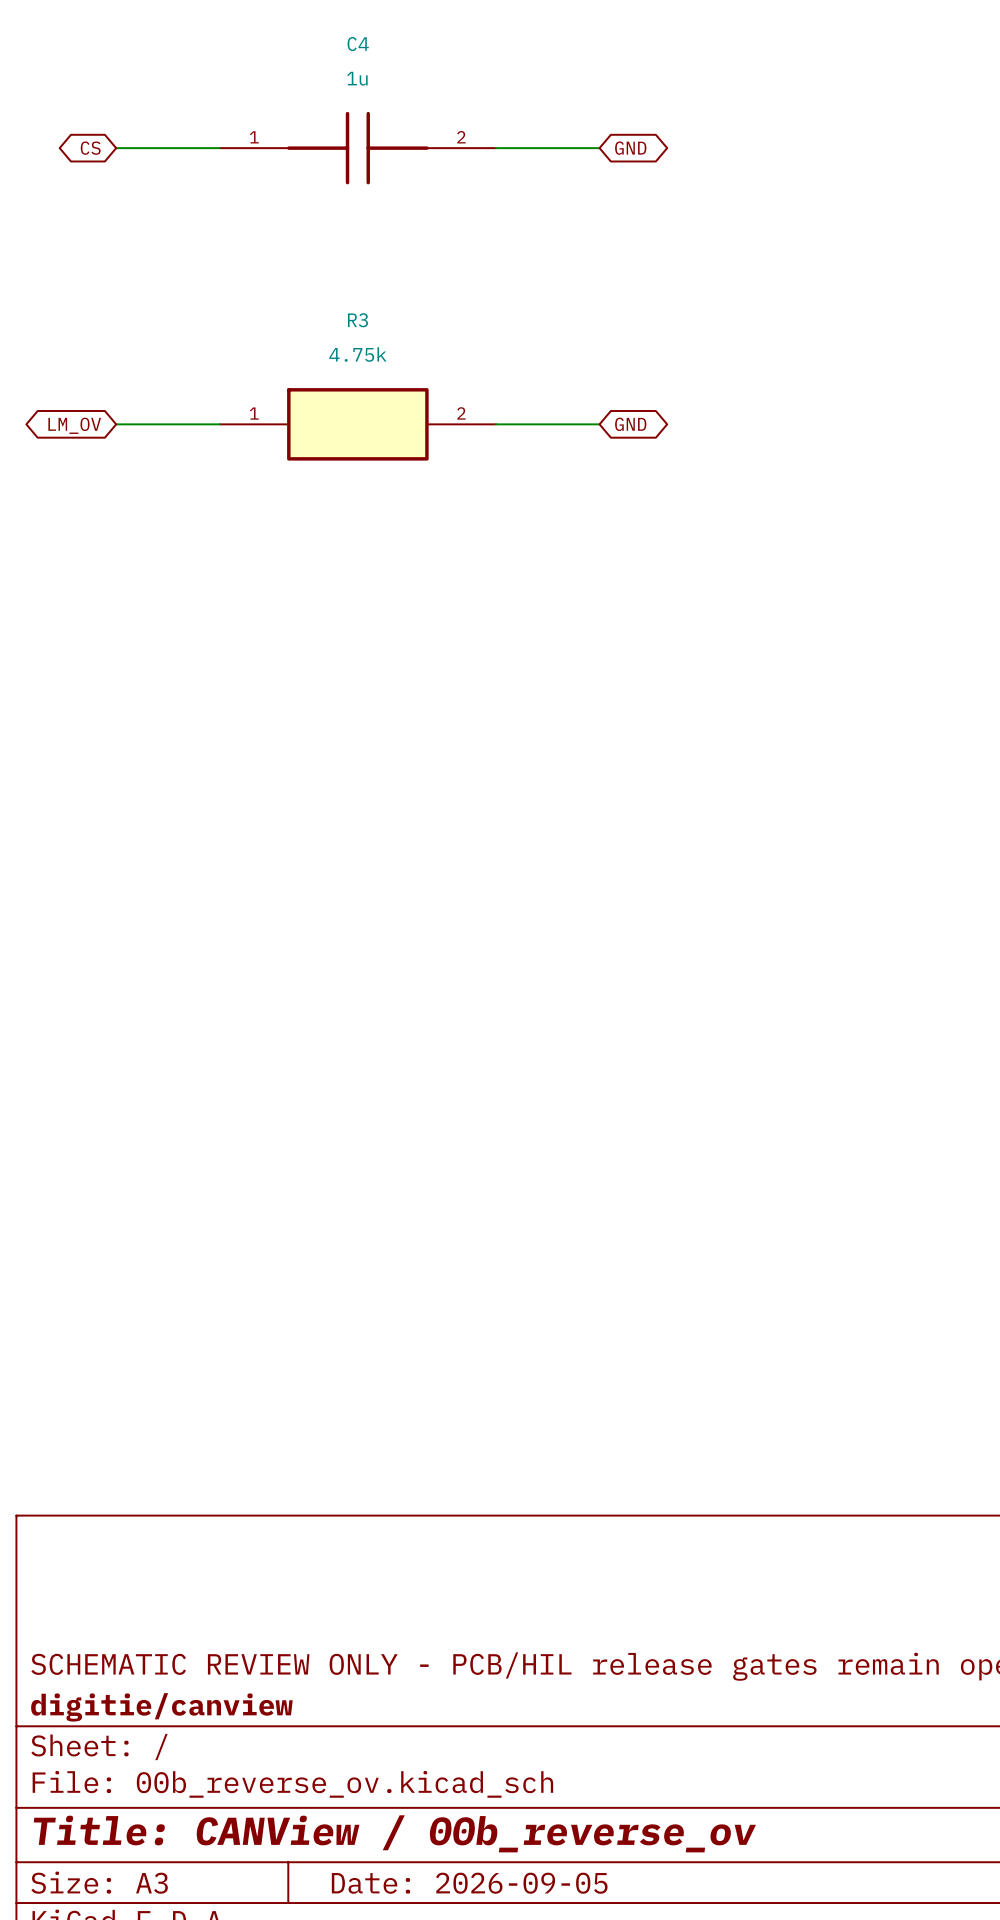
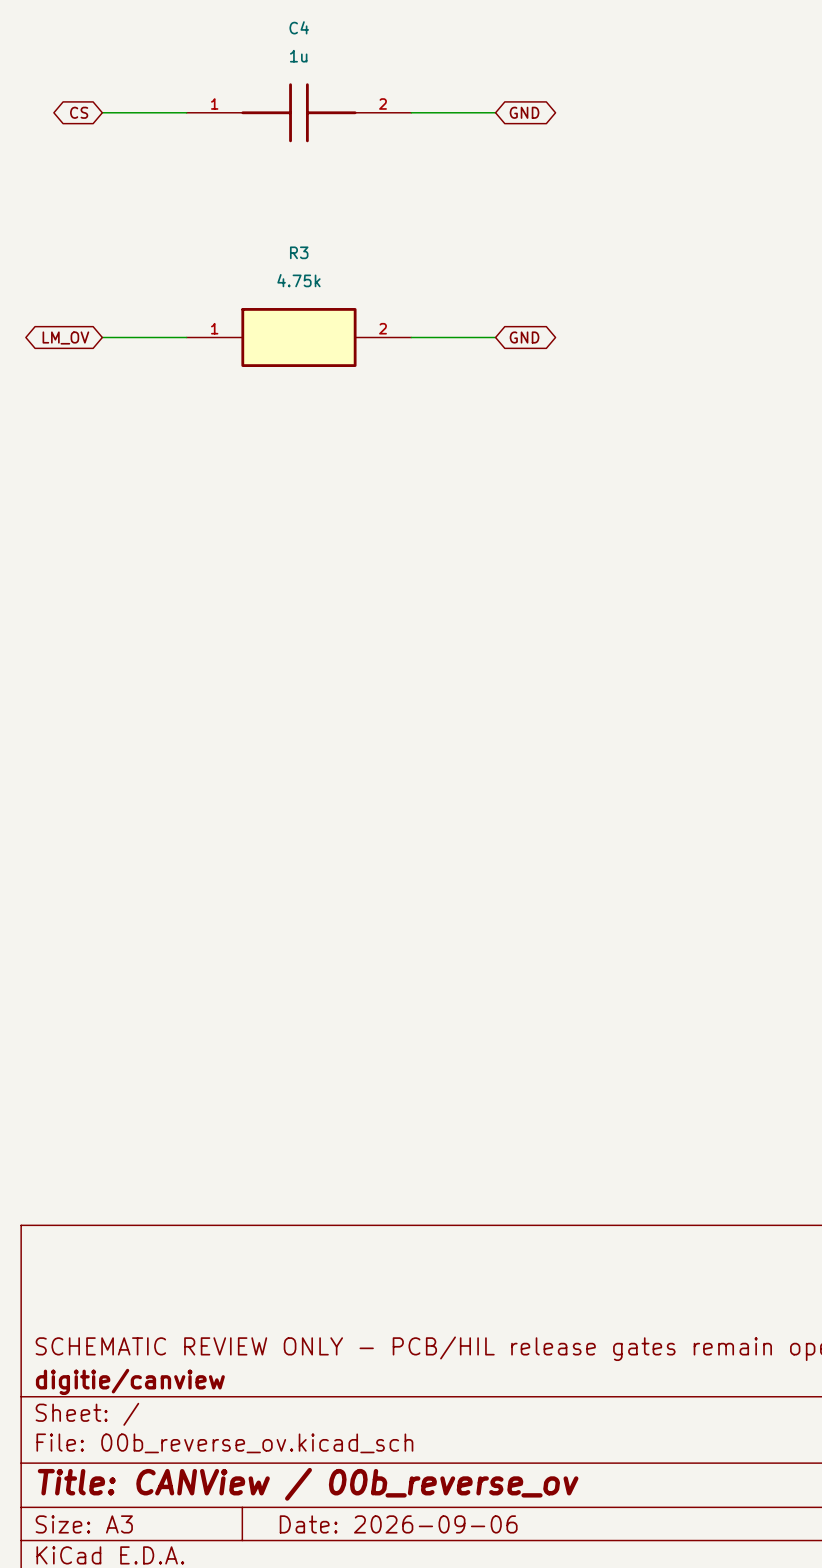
title block: Date: 2026-09-05 (469, 1883) -> Date: 2026-09-06 (398, 1524)

